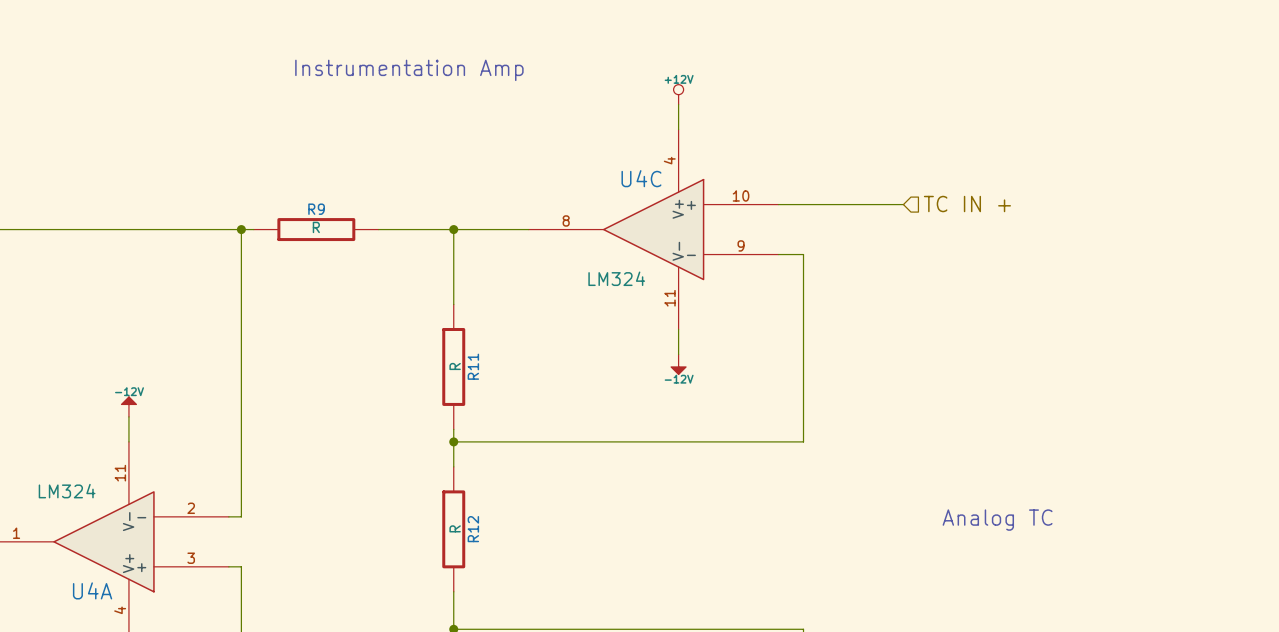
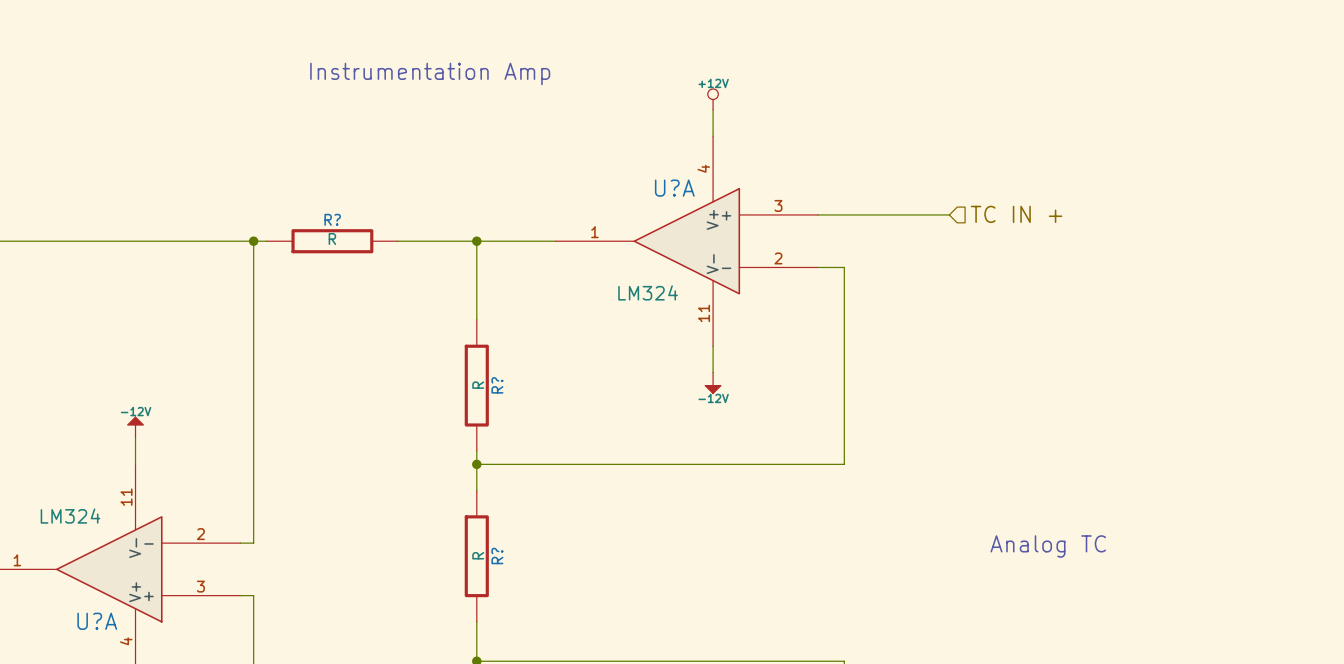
U4C name: U4C (641, 178) -> U?A (674, 188)
U4C pin number: 10 (741, 195) -> 3 (778, 205)
R9 name: R9 (316, 209) -> R? (332, 219)
U4C pin number: 8 (566, 220) -> 1 (594, 232)
U4C pin number: 9 (741, 245) -> 2 (778, 258)
R11 name: R11 (473, 366) -> R? (497, 385)
R12 name: R12 (473, 529) -> R? (497, 556)
U4A name: U4A (92, 590) -> U?A (97, 621)

